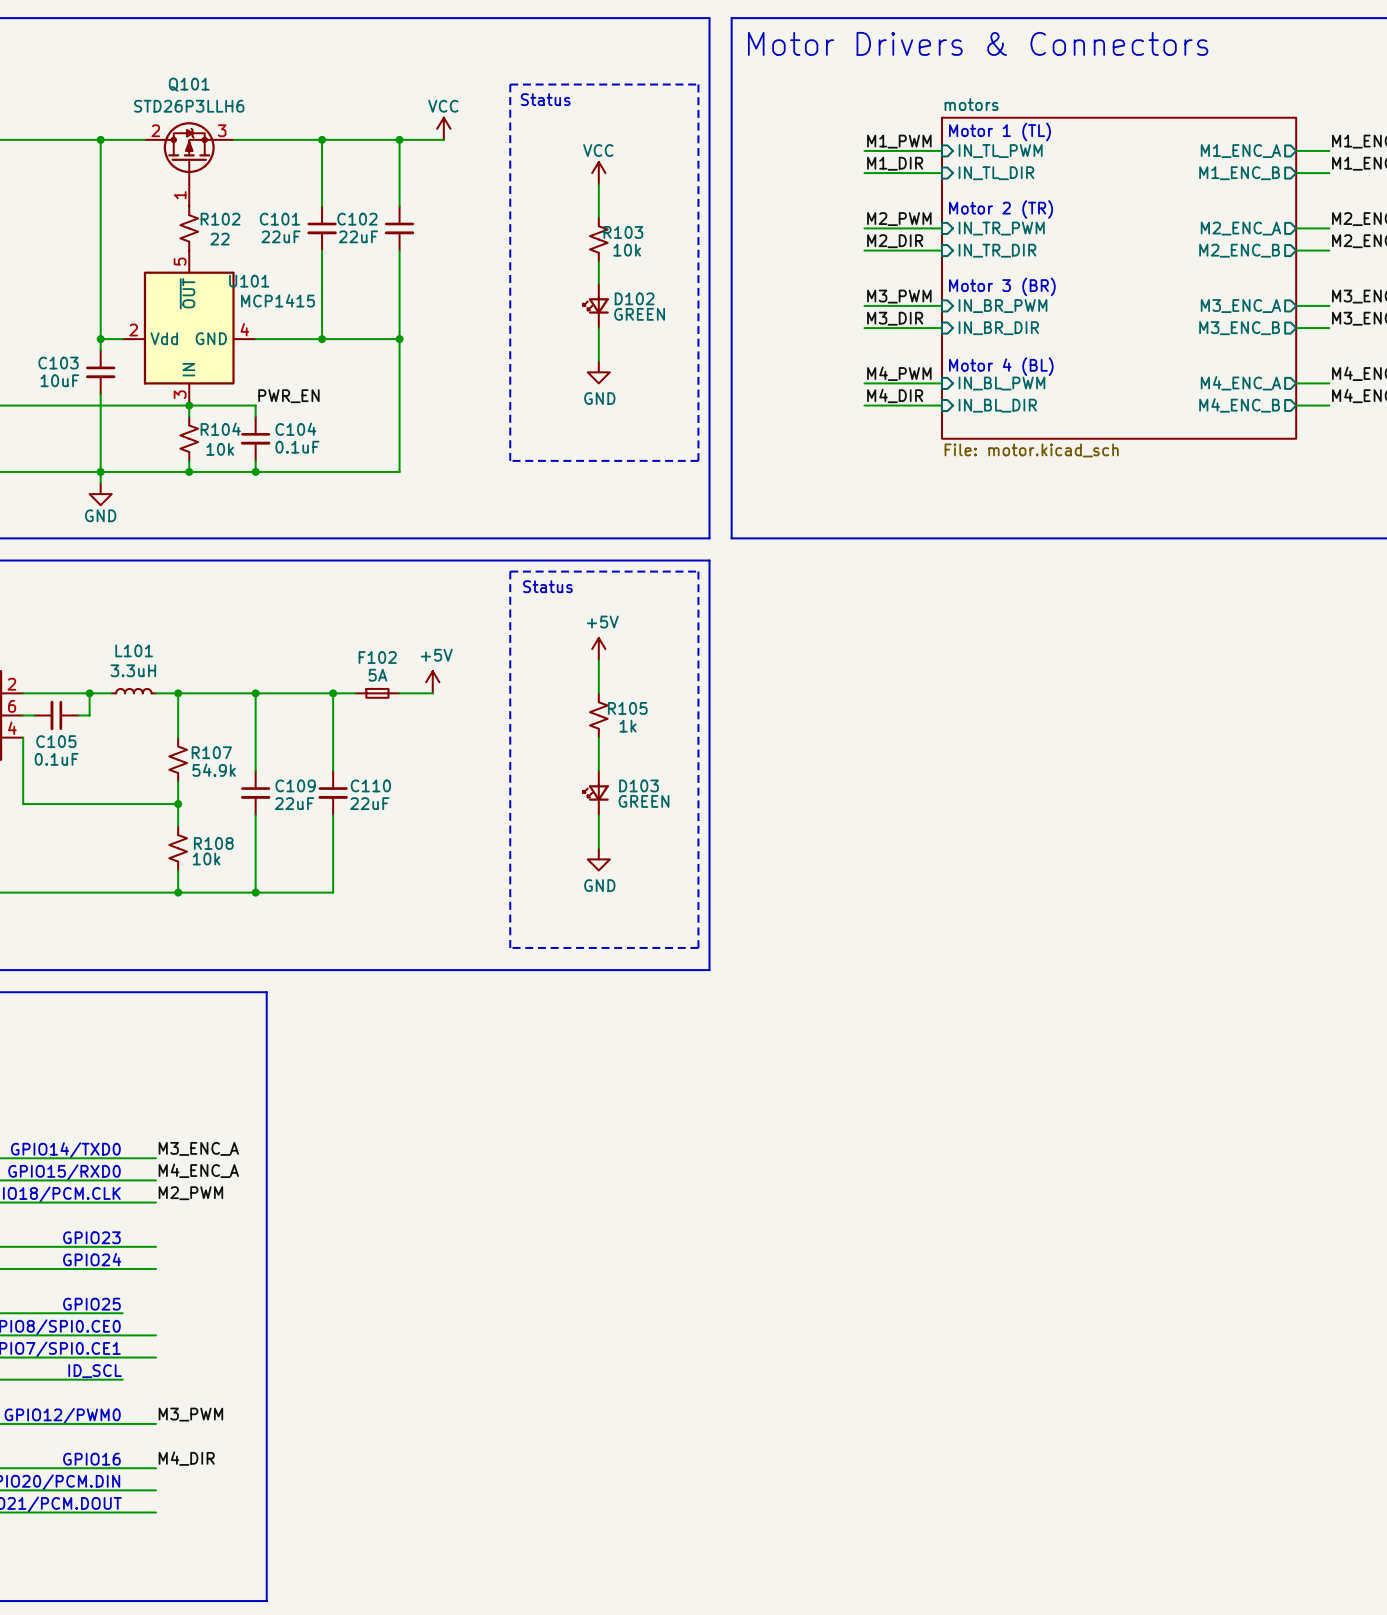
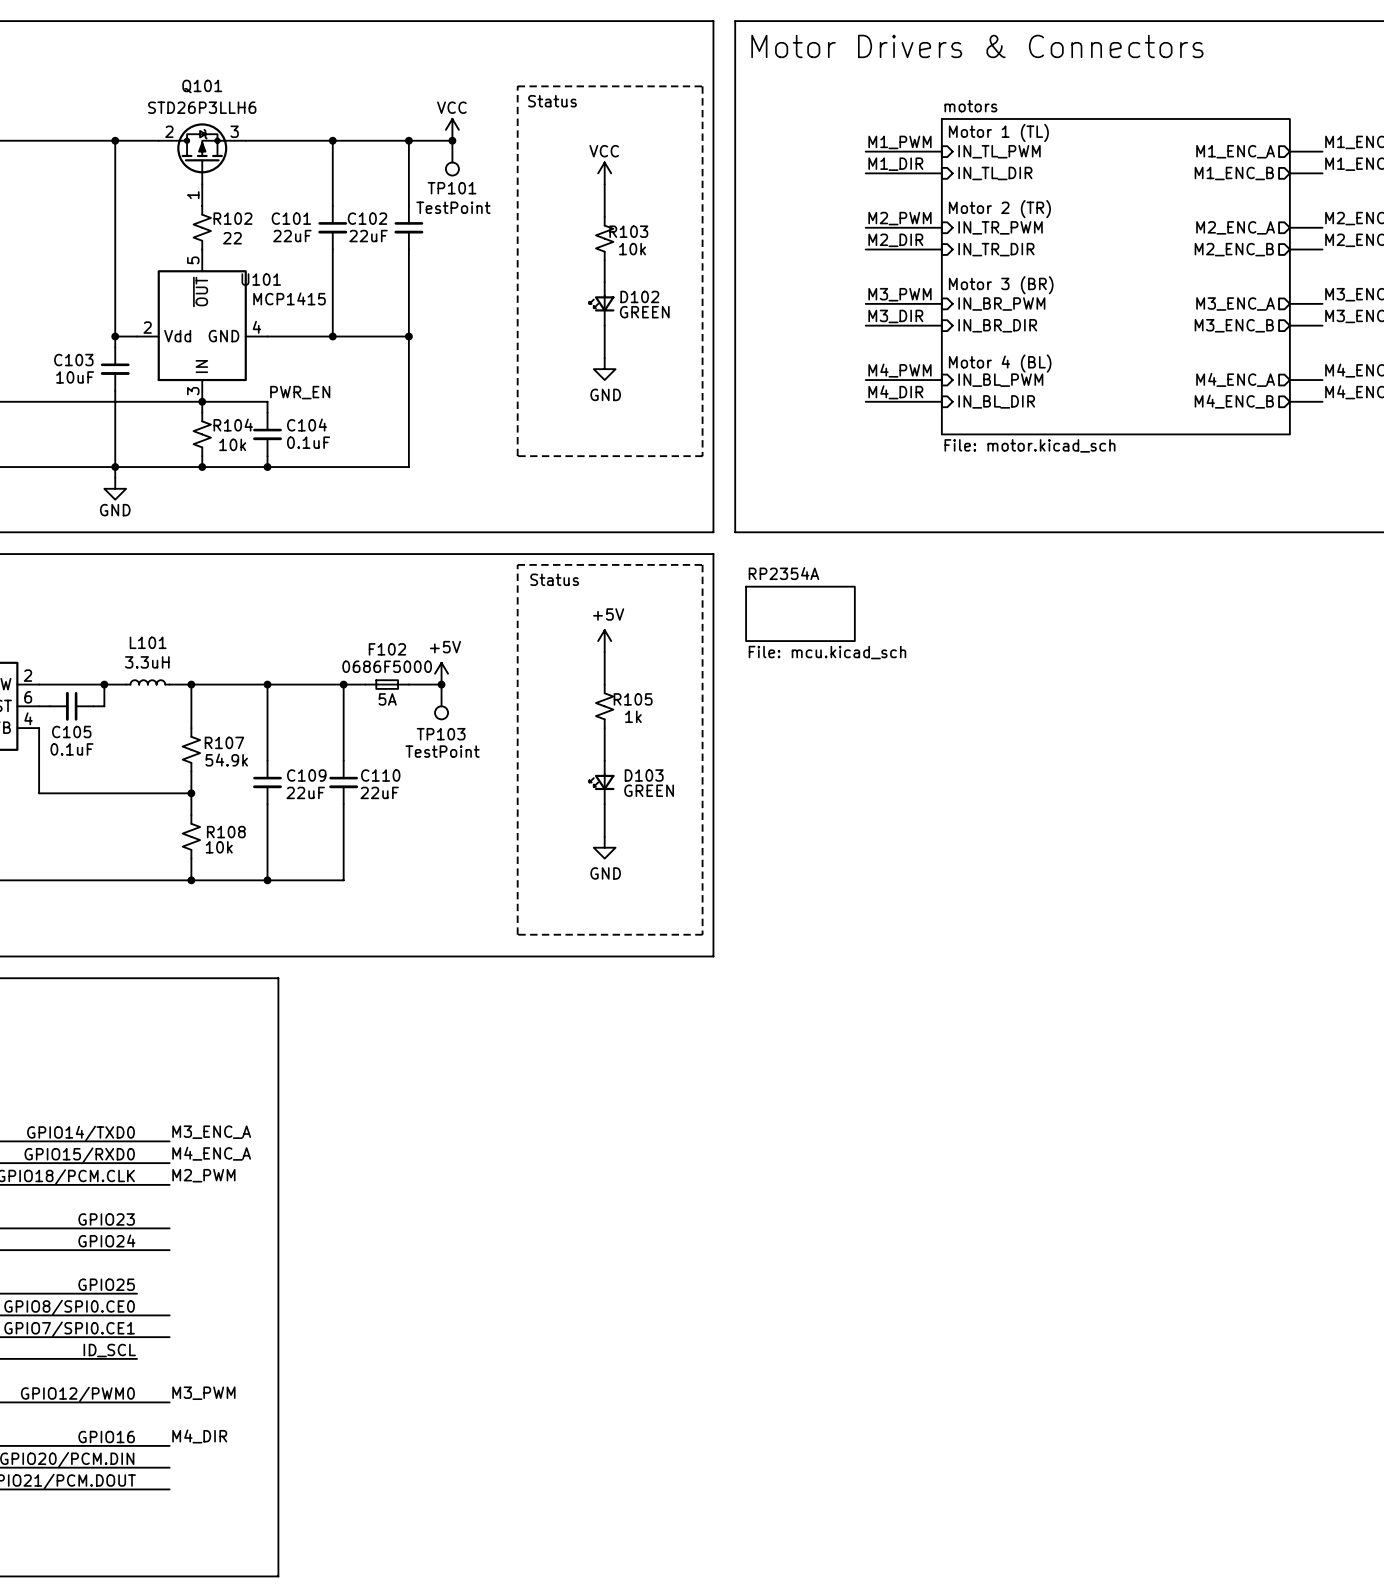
junction: none -> (452, 140)
TP101: none -> TestPoint (452, 158)
sheet RP2354A: none -> File: mcu.kicad_sch (800, 613)
F102 value: 5A (377, 675) -> 0686F5000 (387, 666)
junction: none -> (441, 684)
text: none -> 5A (387, 699)
TP103: none -> TestPoint (441, 701)

